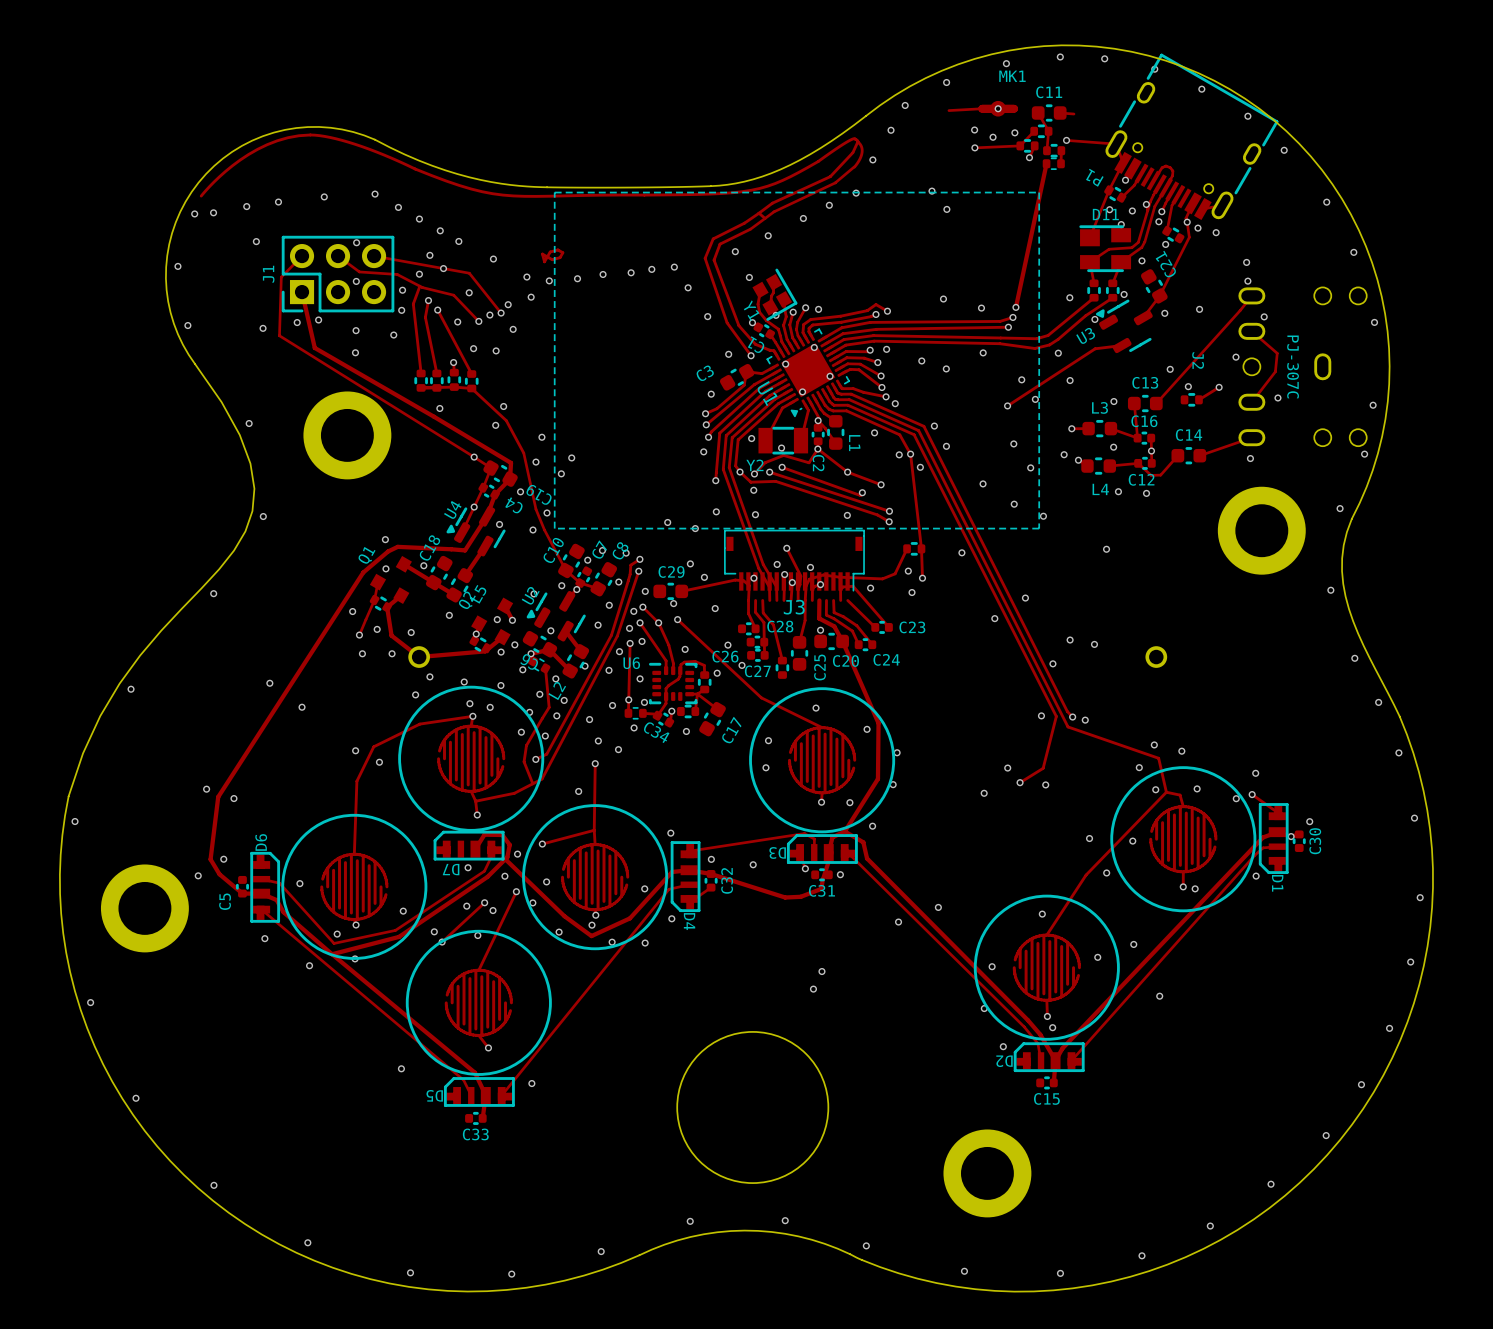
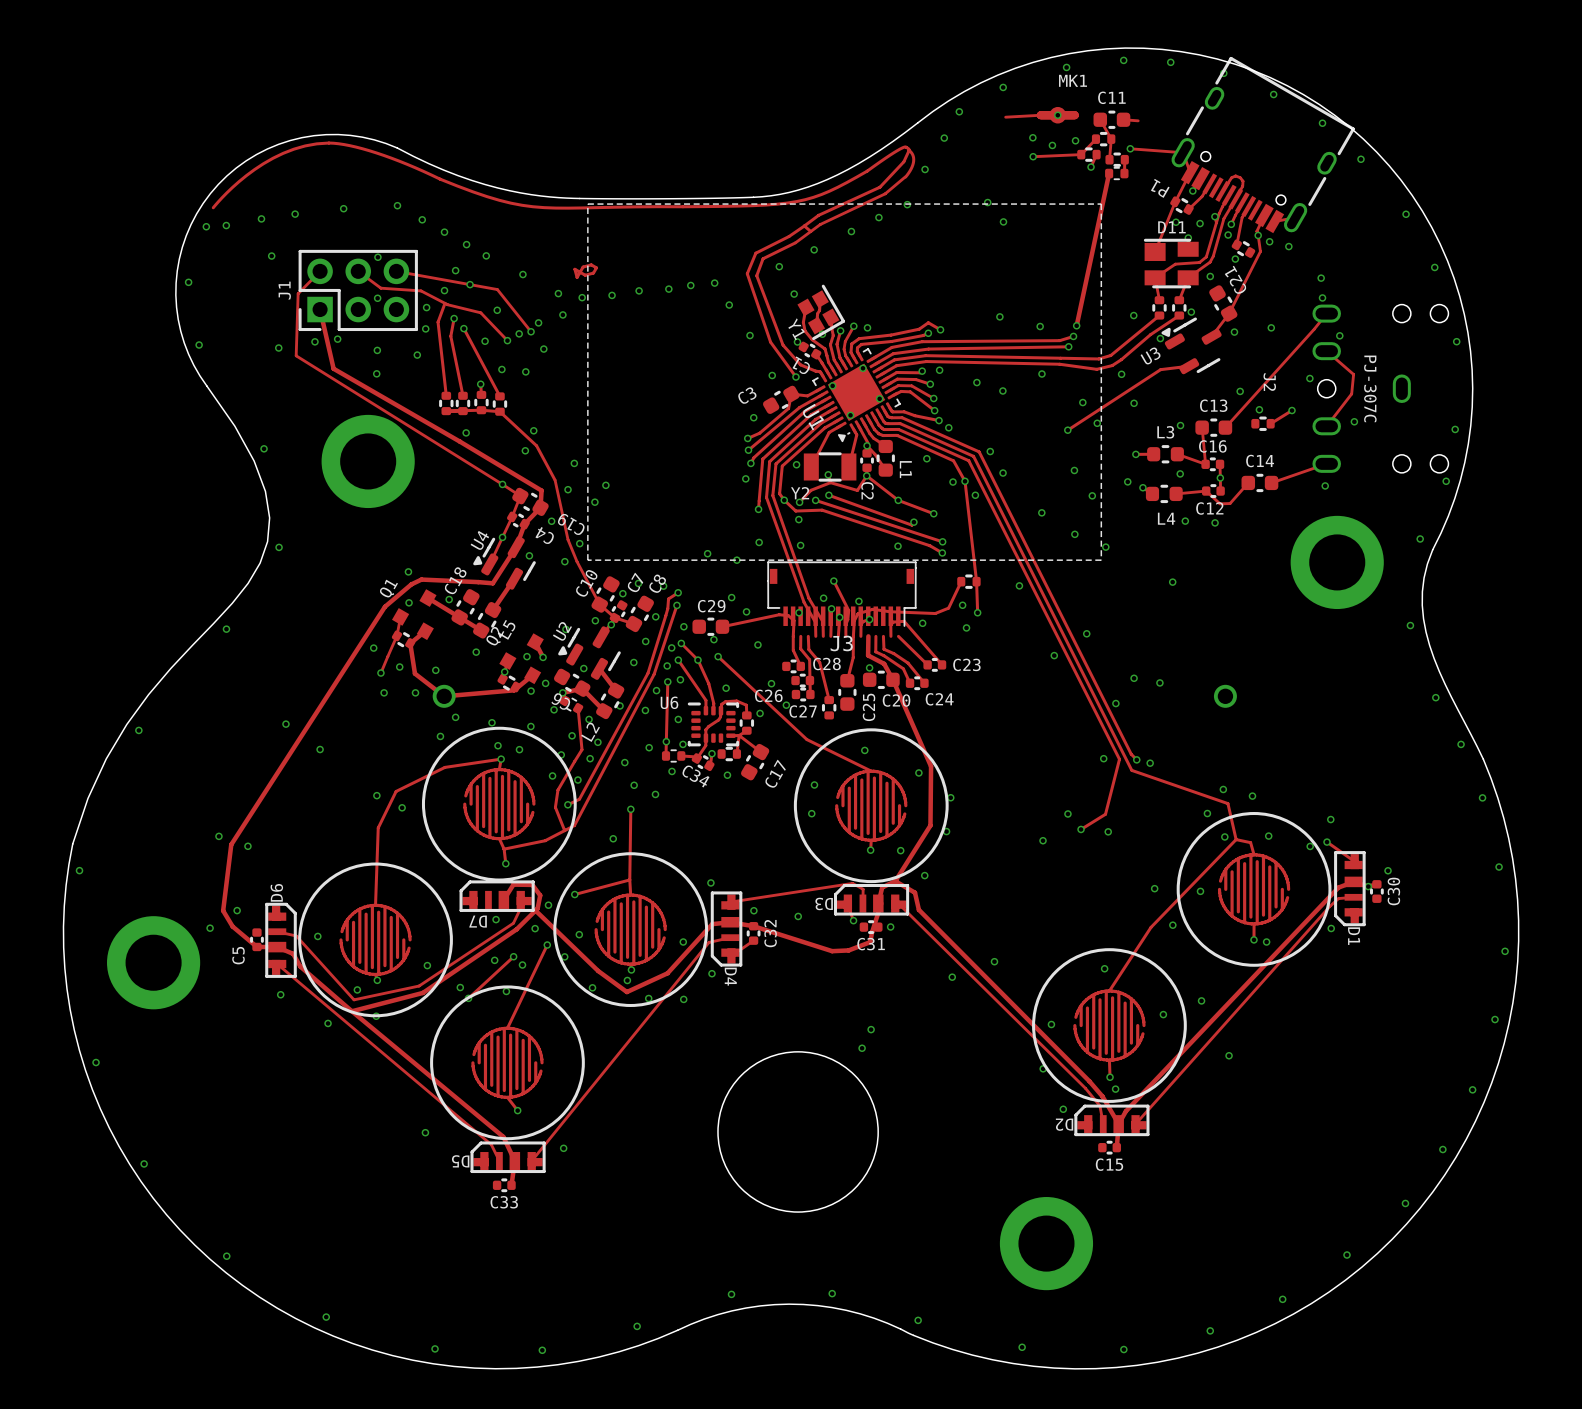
round board edge position: (752, 1107) -> (798, 1131)

